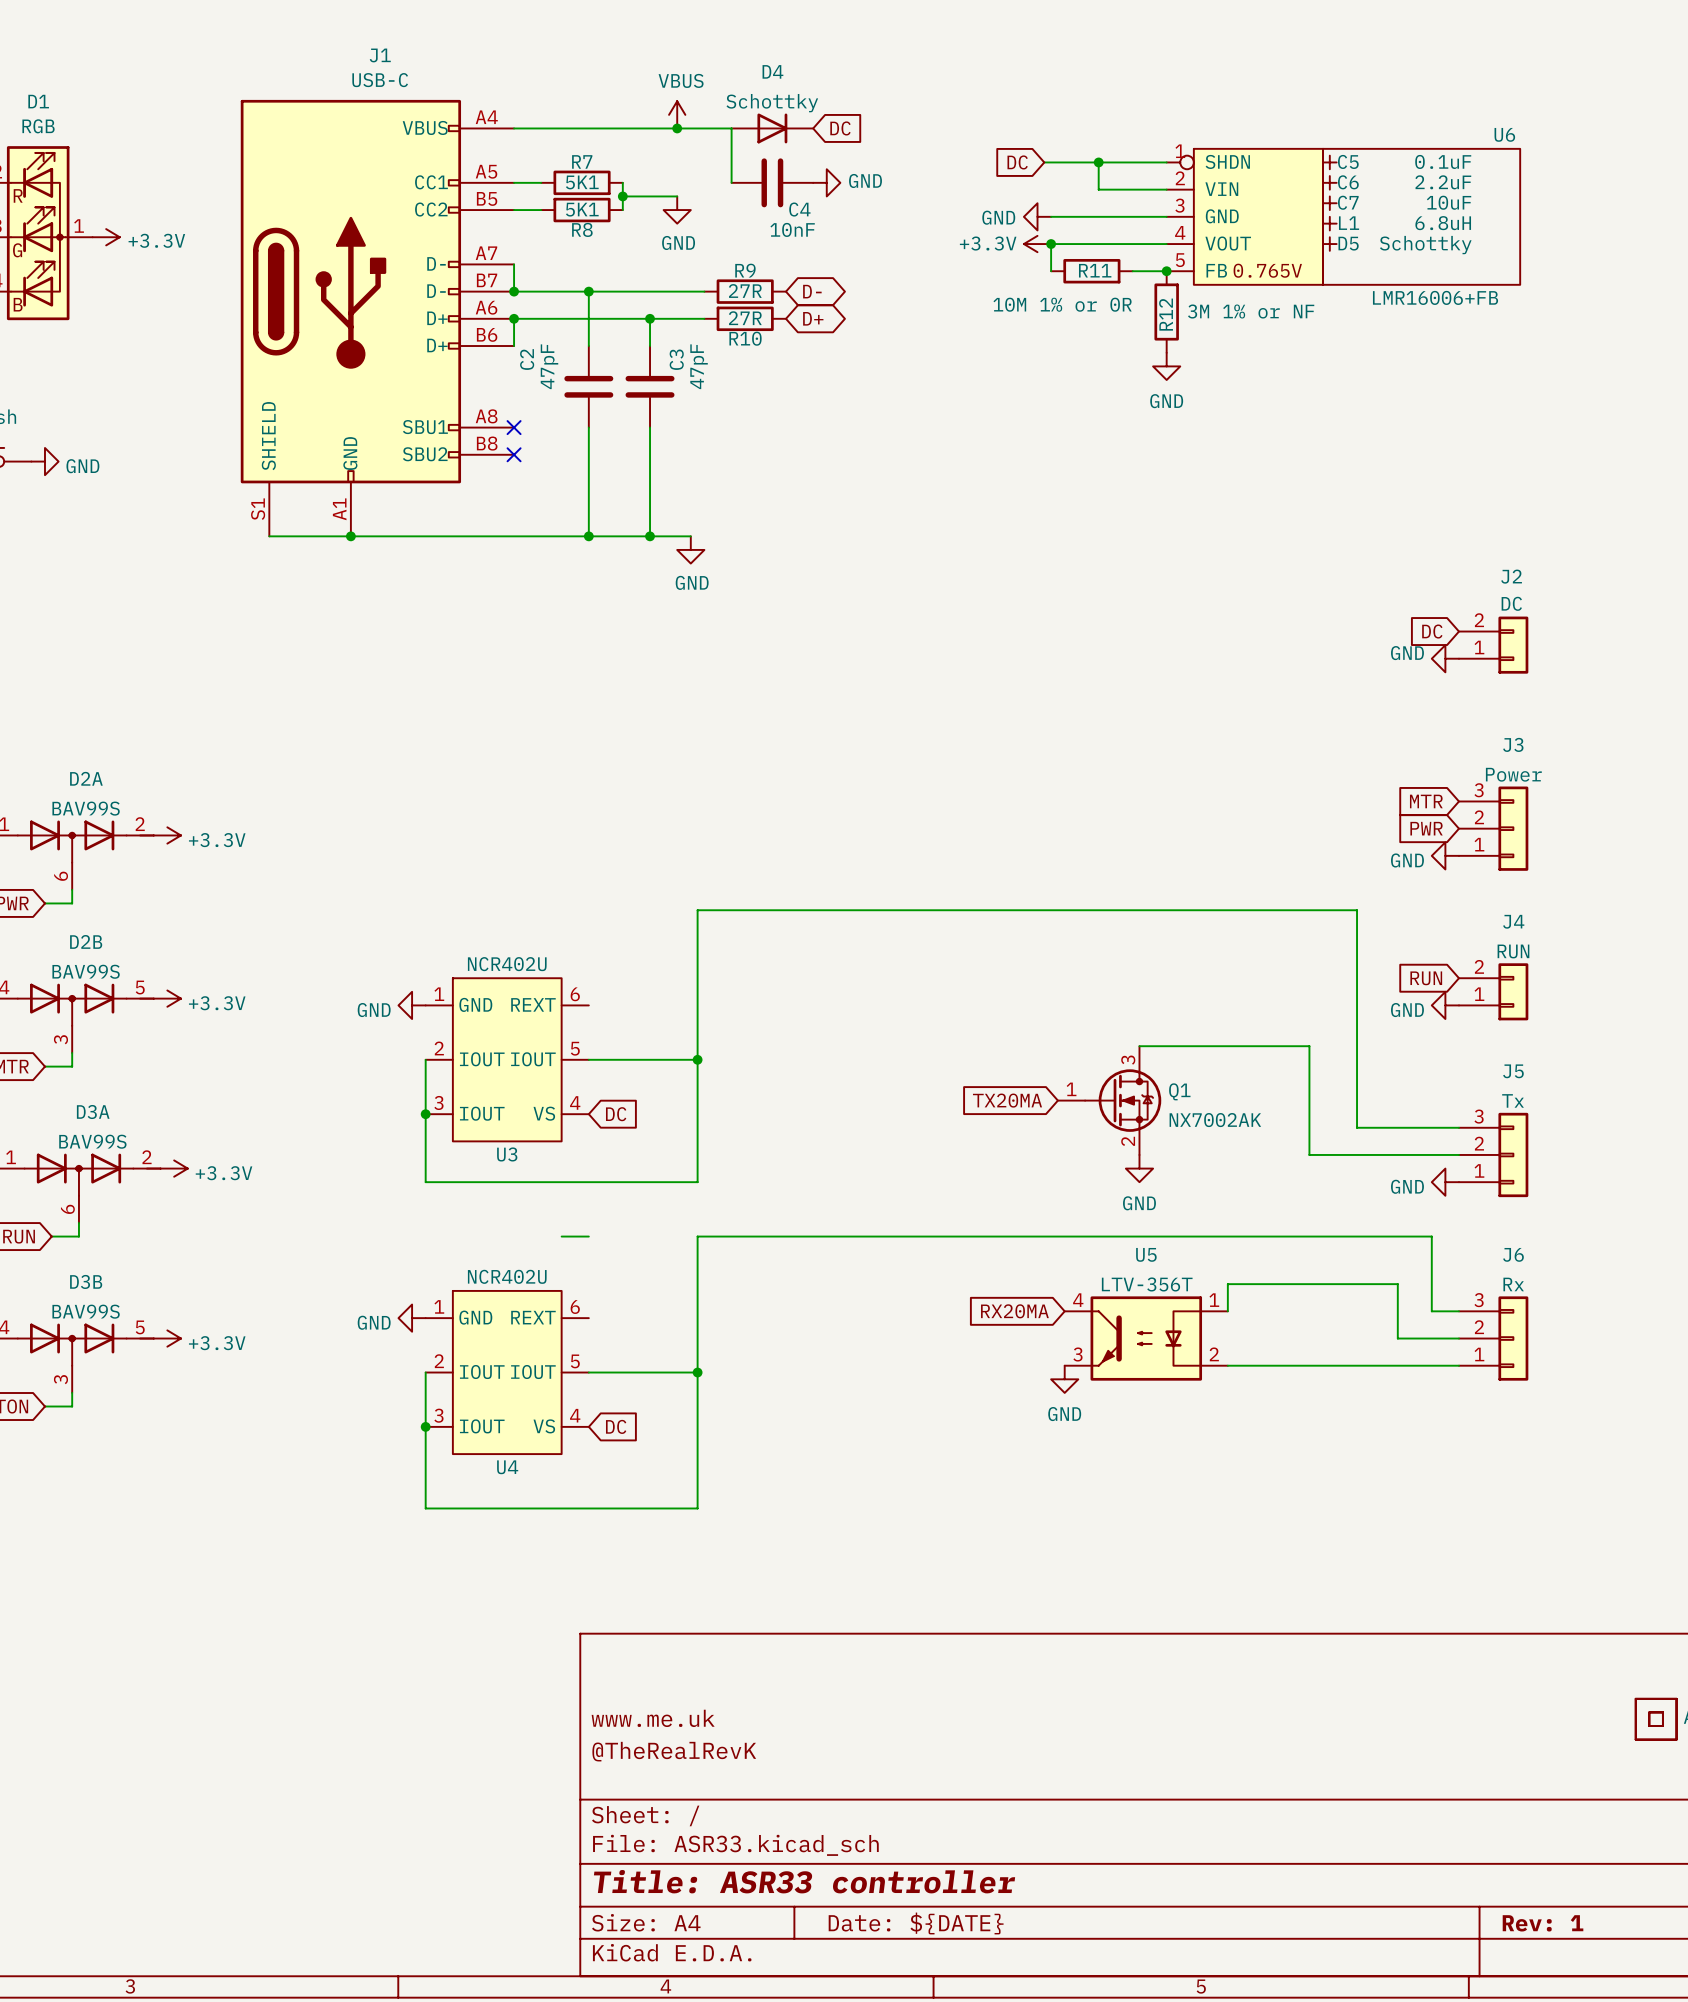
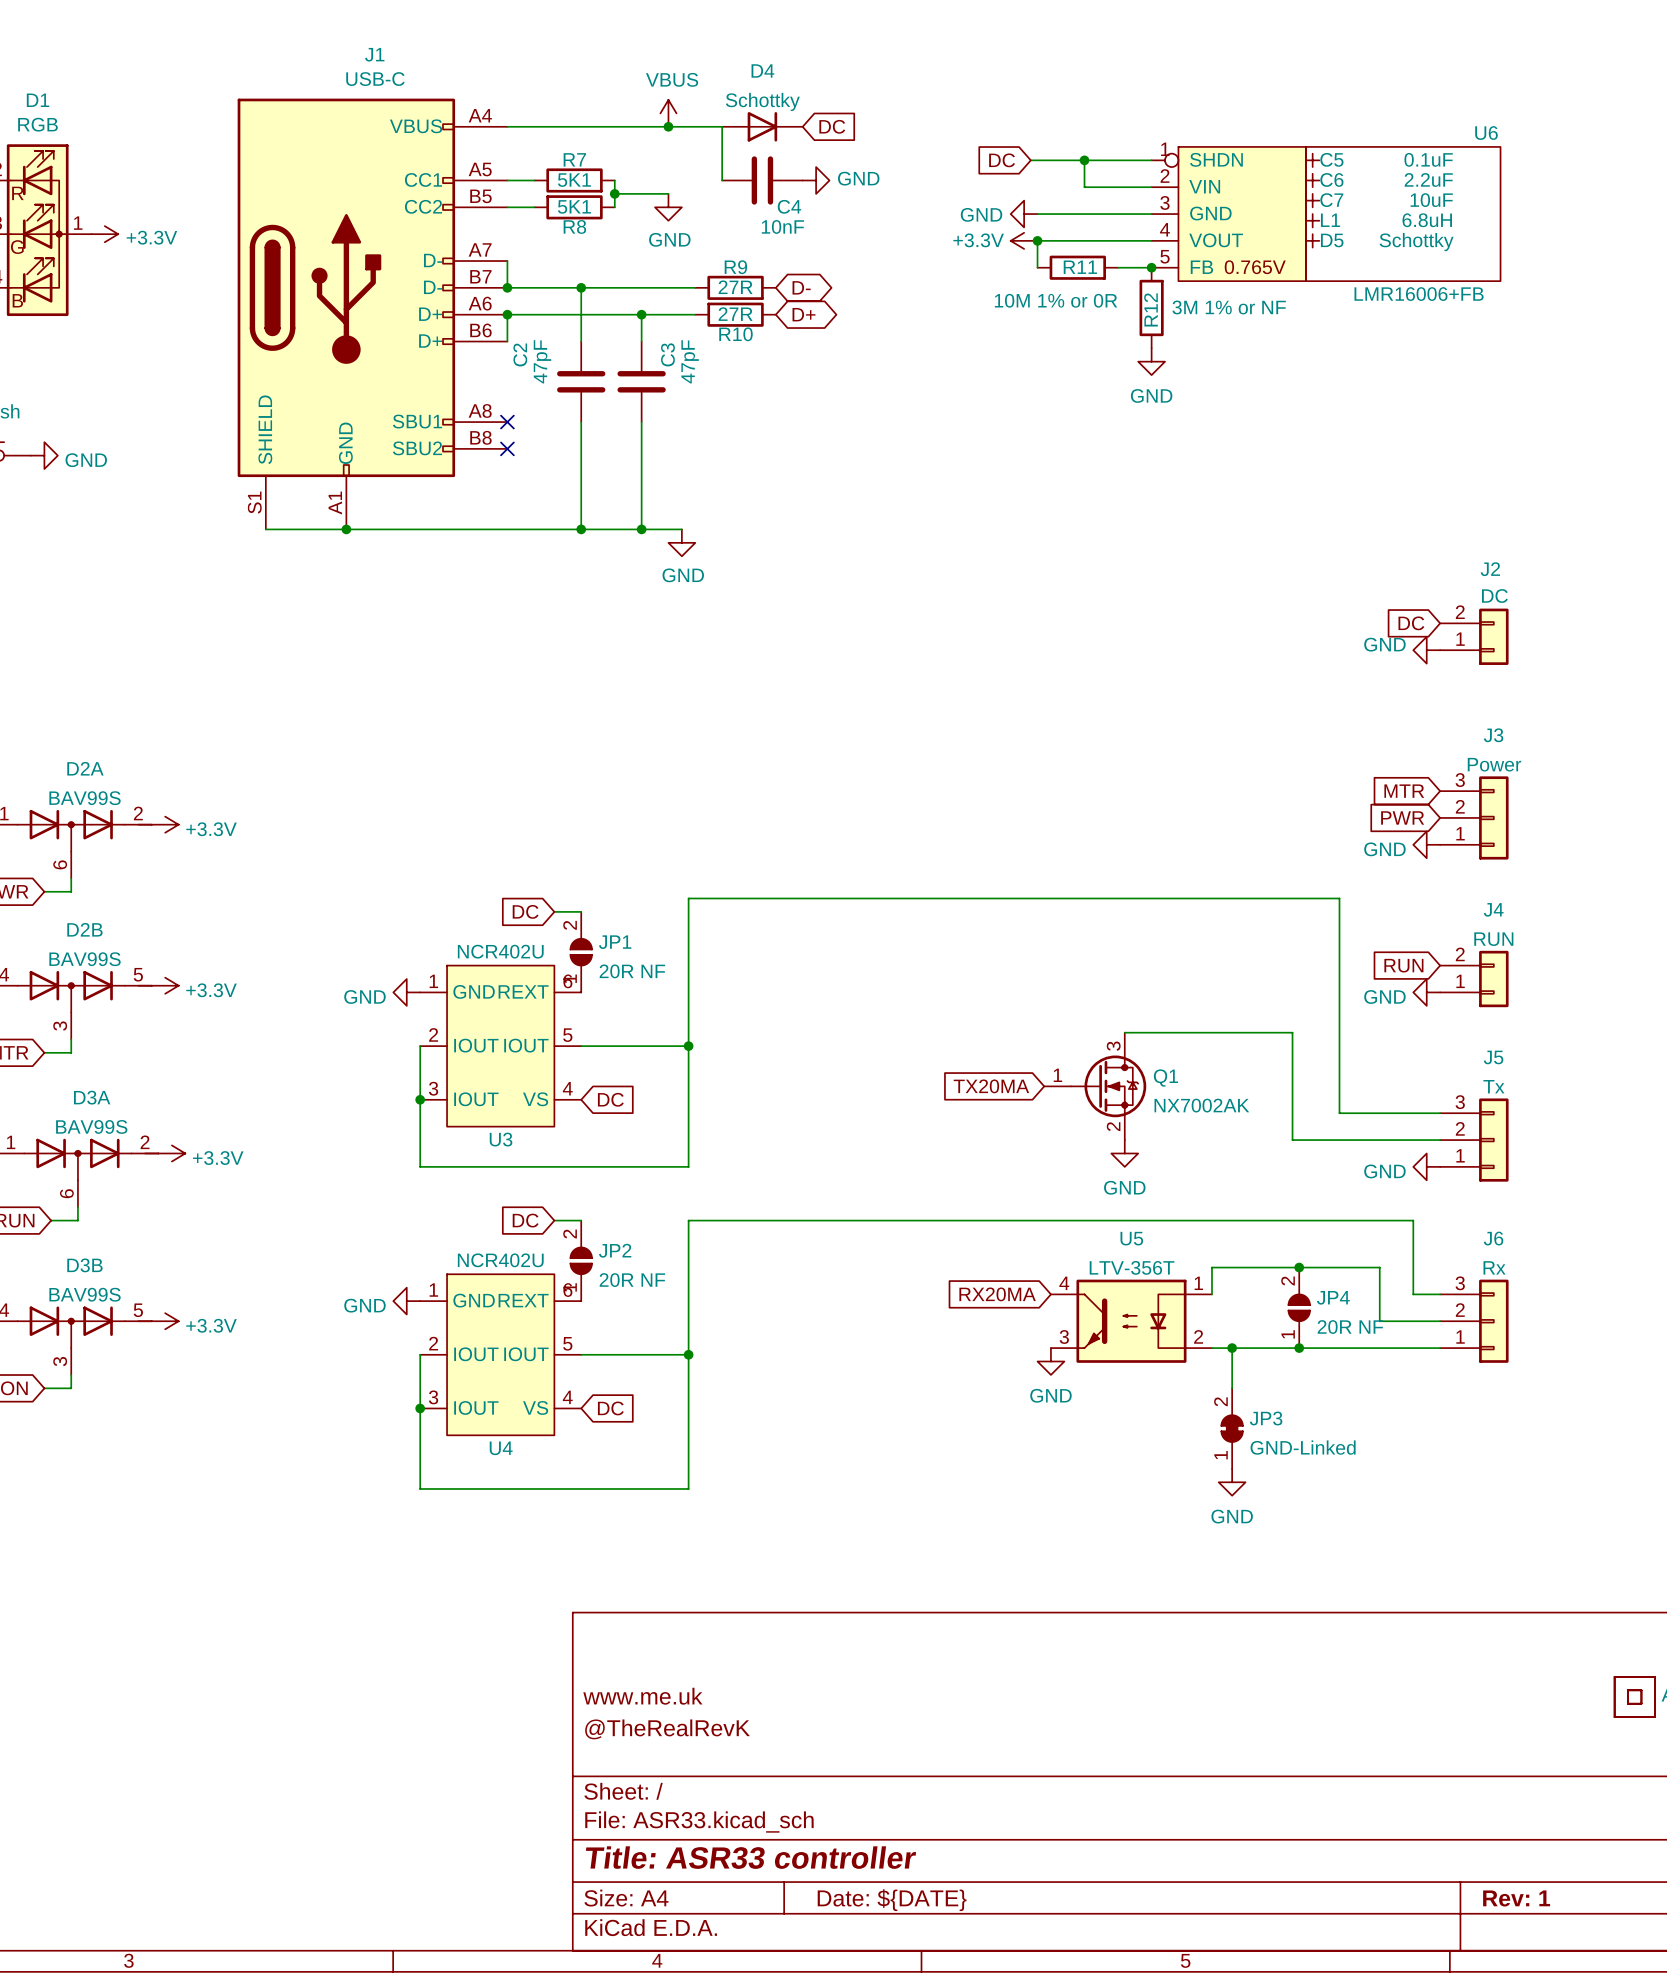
global label: none -> DC (525, 911)
wire: none -> (554, 911) (581, 911)
JP1: none -> 20R NF (581, 952)
global label: none -> DC (525, 1220)
JP2: none -> 20R NF (581, 1260)
junction: none -> (1299, 1267)
JP4: none -> 20R NF (1299, 1307)
wire: none -> (1232, 1348) (1232, 1388)
junction: none -> (1232, 1348)
junction: none -> (1299, 1348)
JP3: none -> GND-Linked (1232, 1428)
power symbol: none -> GND (1232, 1482)

